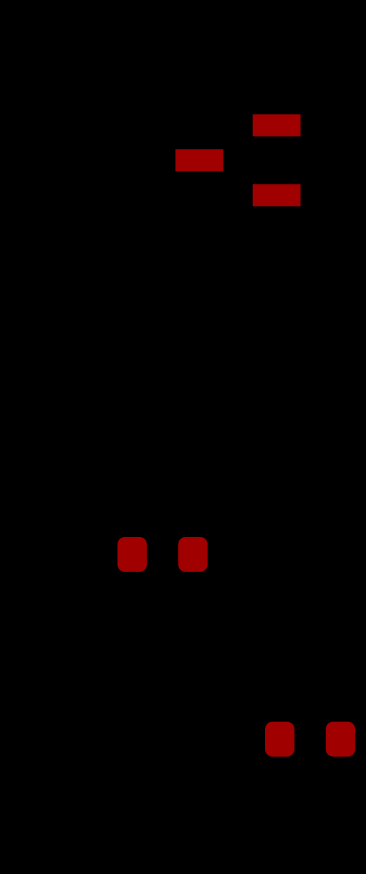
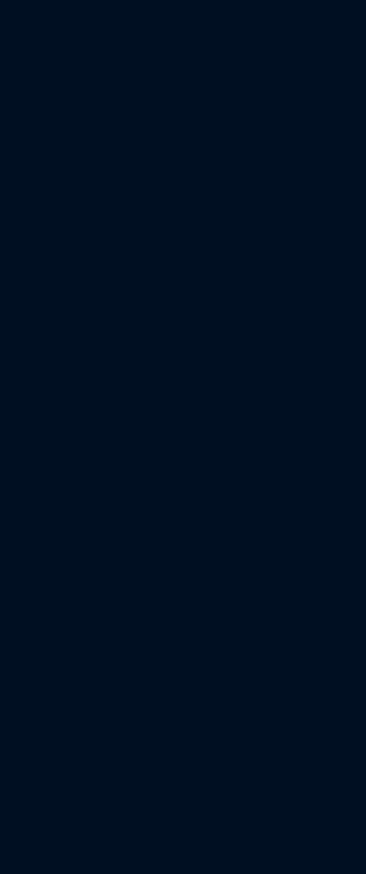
part: (237, 160) -> none
part: (162, 554) -> none
part: (310, 739) -> none

